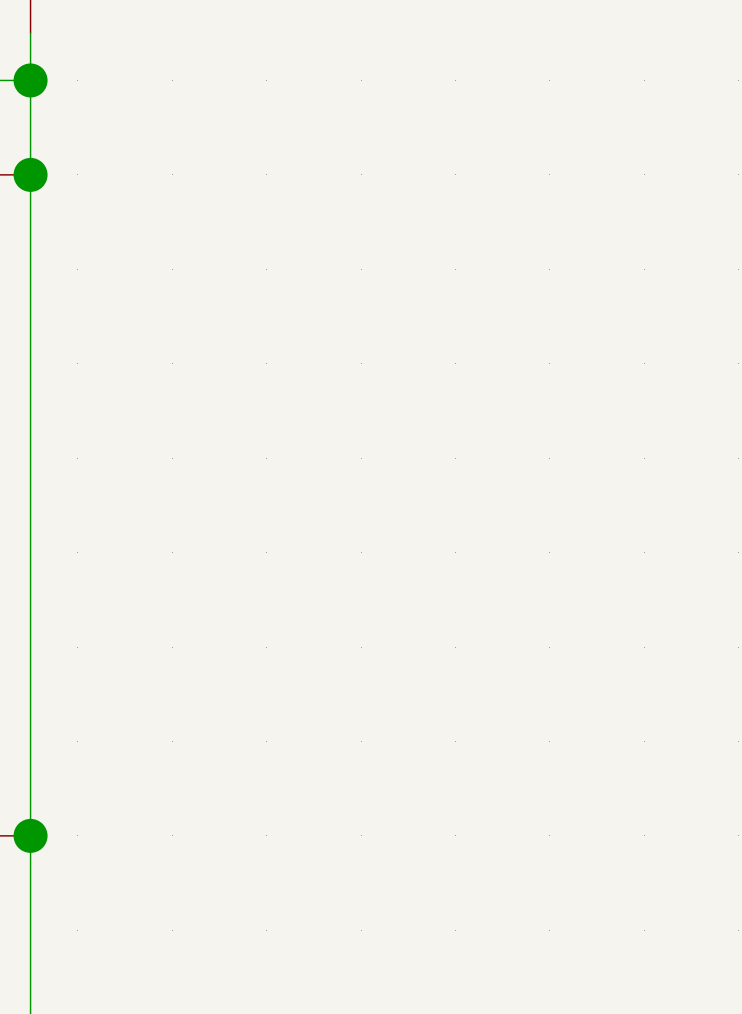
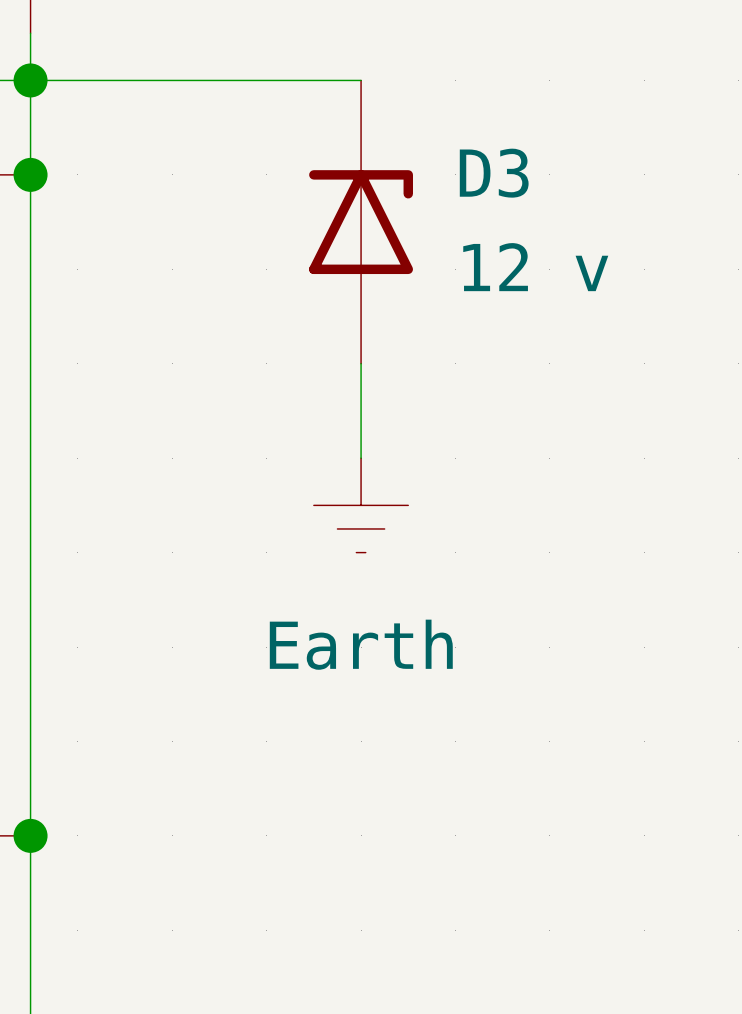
wire: none -> (30, 80) (361, 80)
D3: none -> 12 v (361, 222)
wire: none -> (361, 363) (361, 458)
power symbol: none -> Earth (361, 505)

